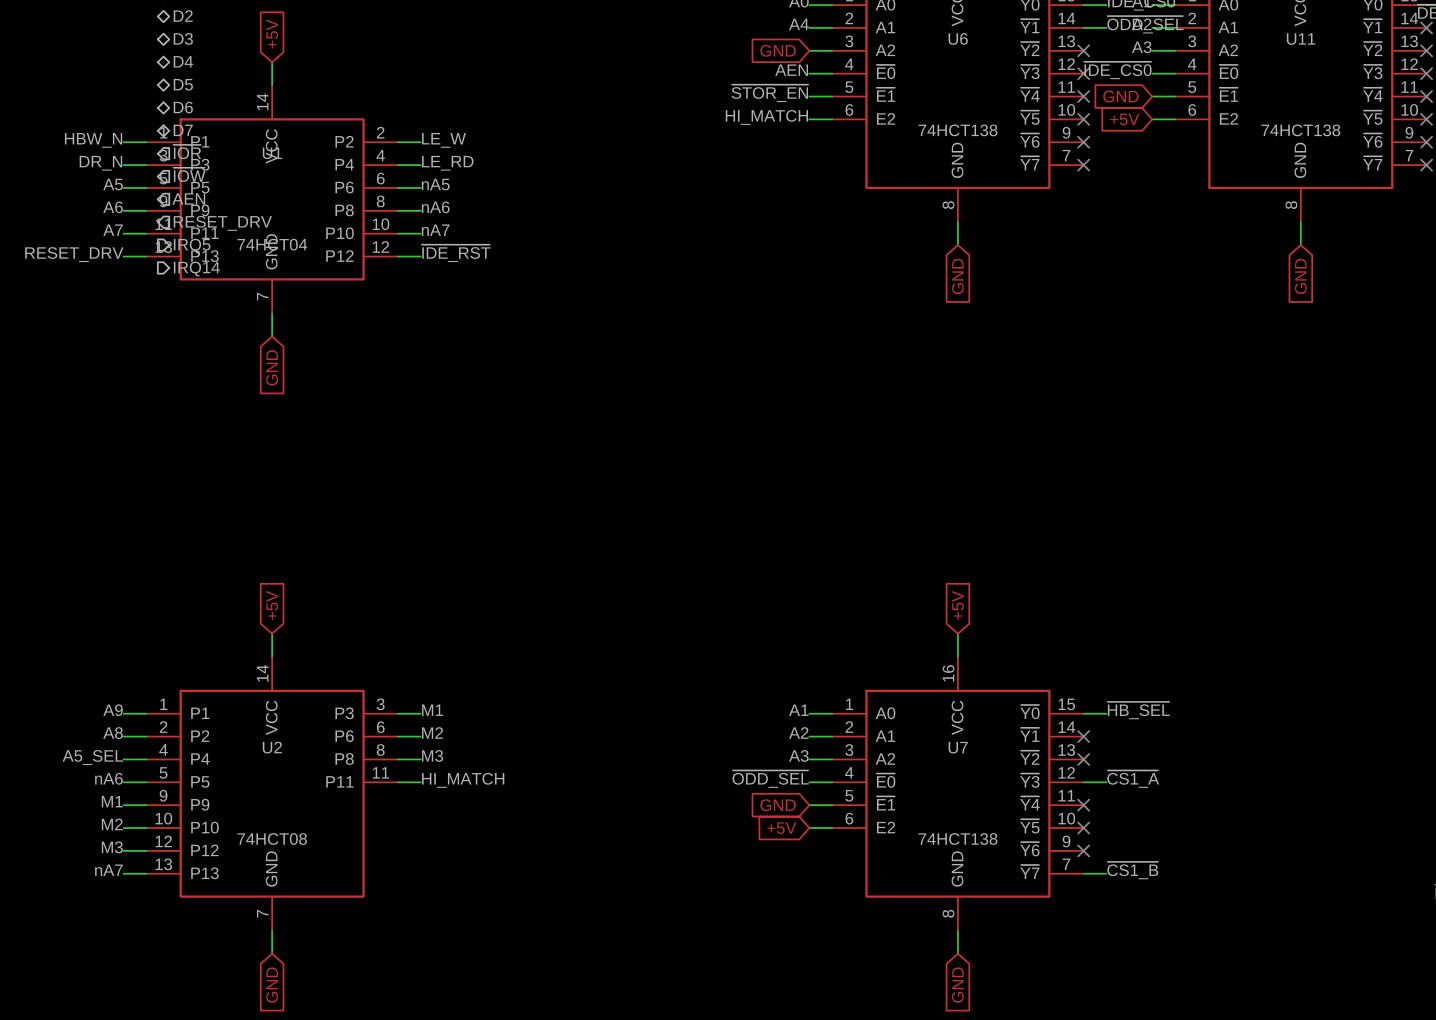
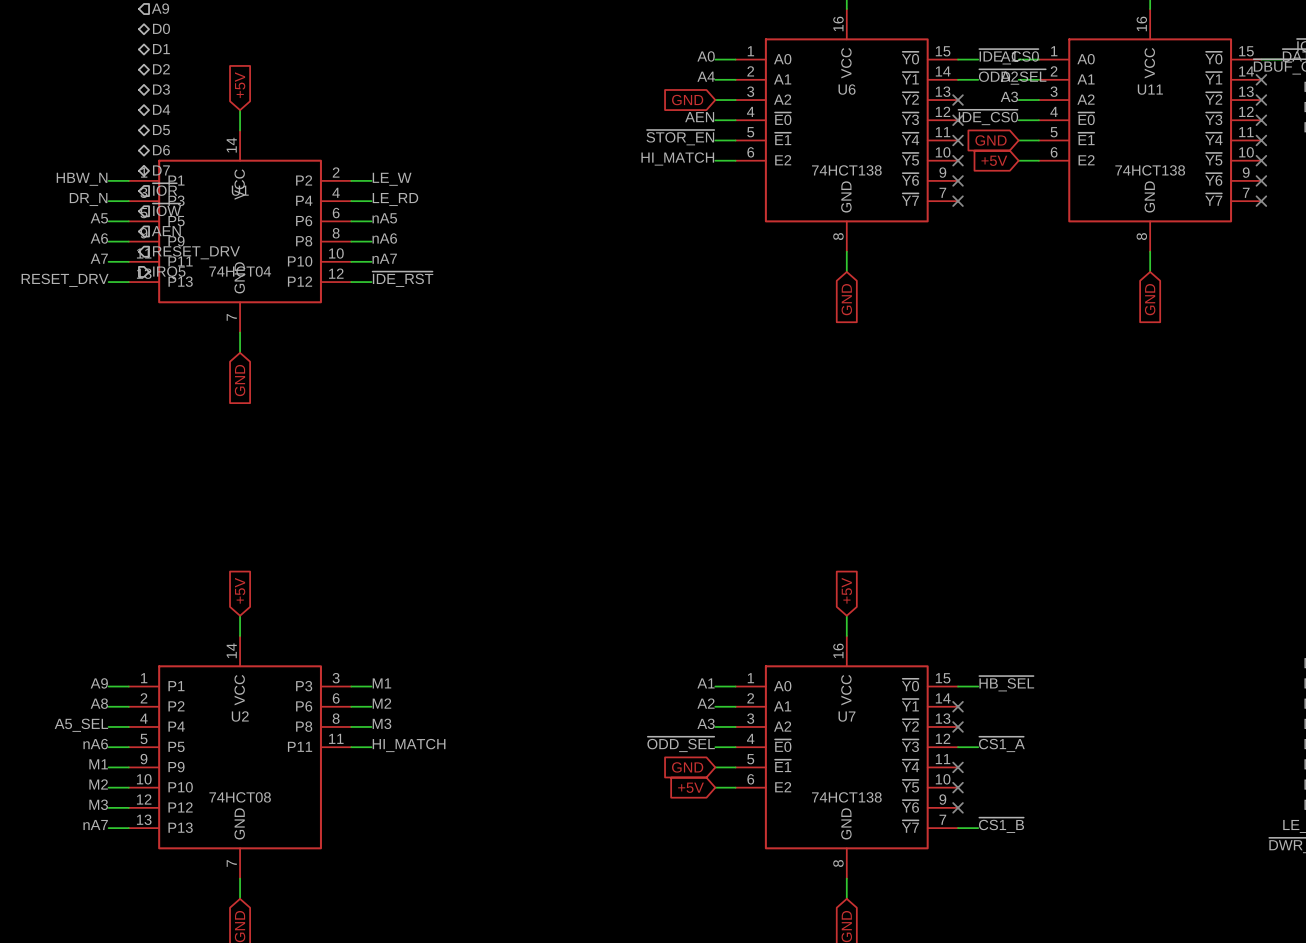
hierarchical label: IRQ14 (196, 269) -> none

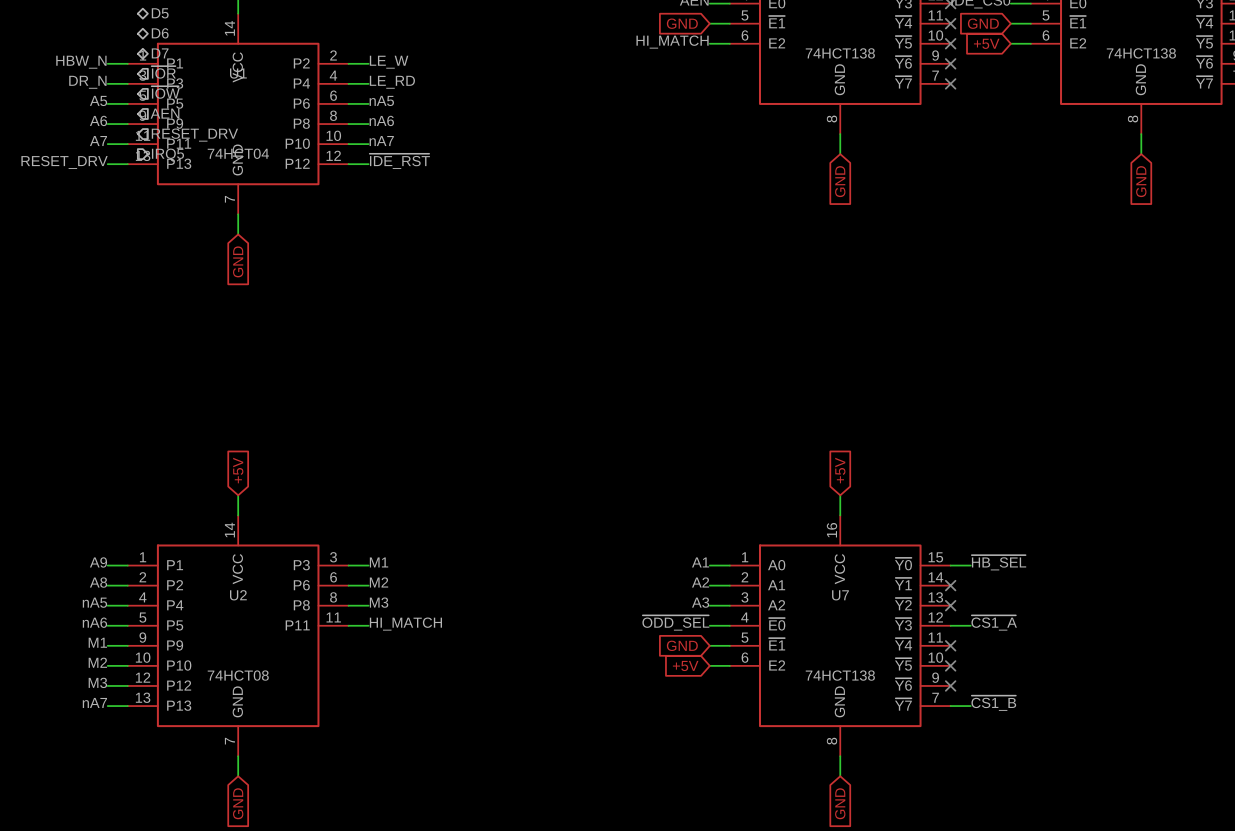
label: ~{STOR_EN} (680, 137) -> none
global label: none -> GND (682, 23)
label: A5_SEL (81, 725) -> nA5 (94, 602)

